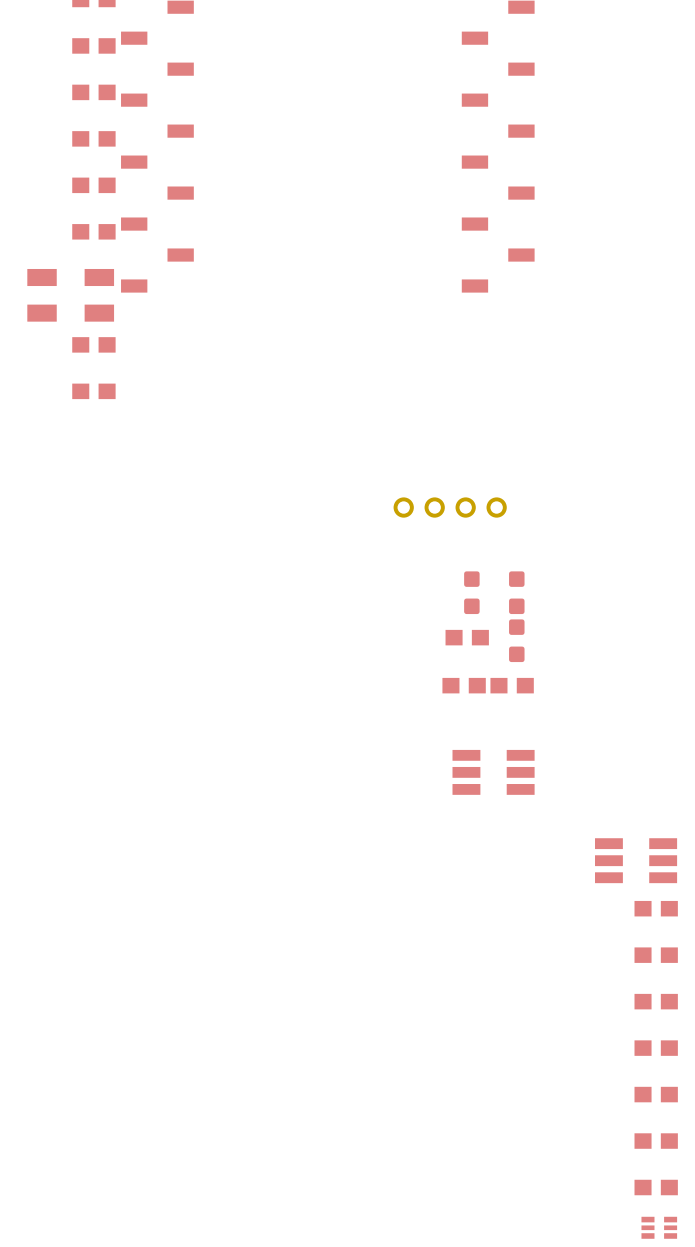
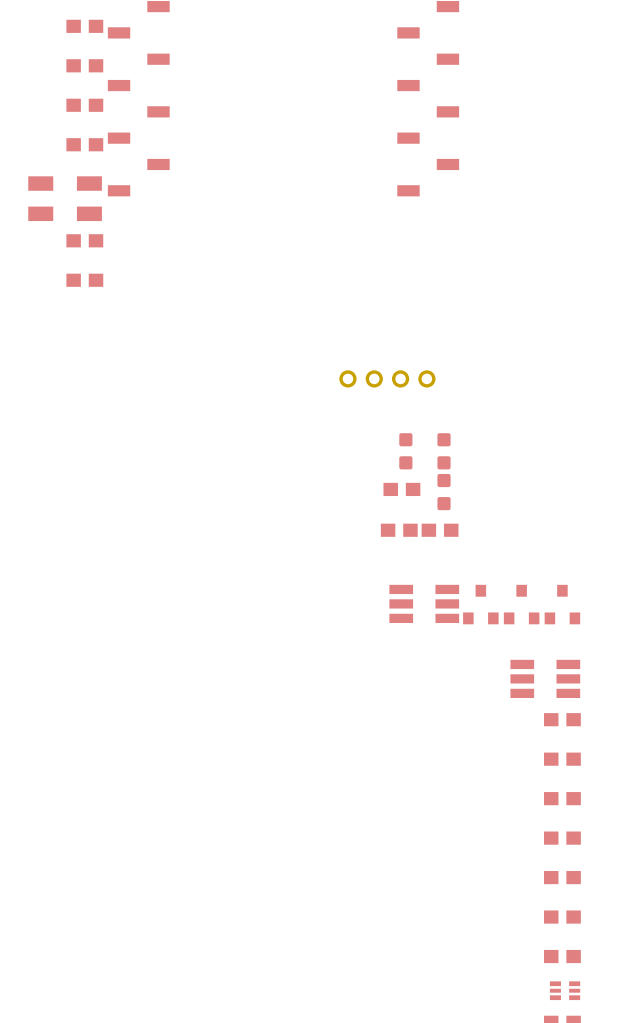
part: none -> (480, 604)
part: none -> (521, 604)
part: none -> (562, 604)

